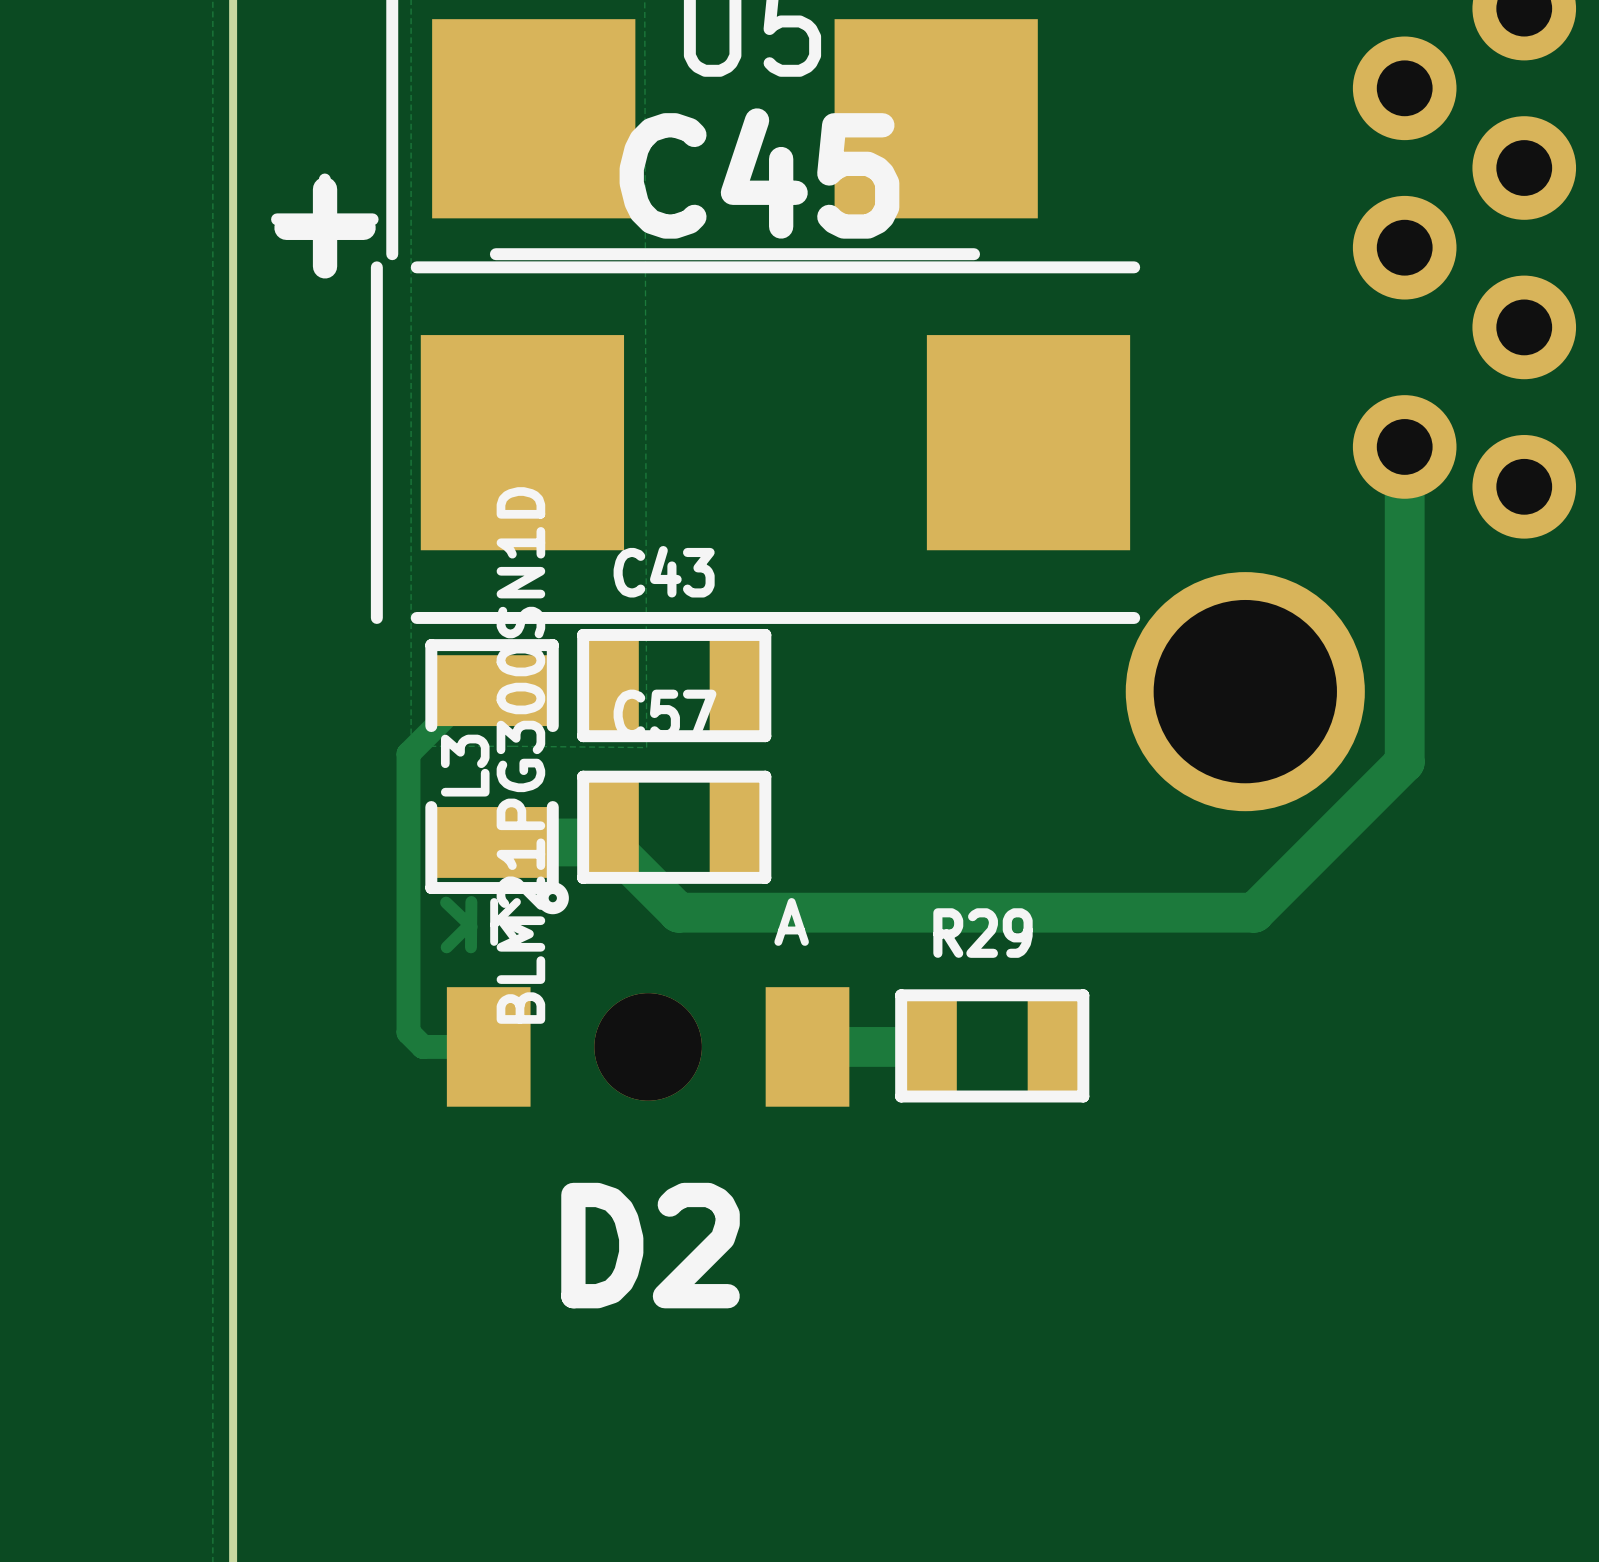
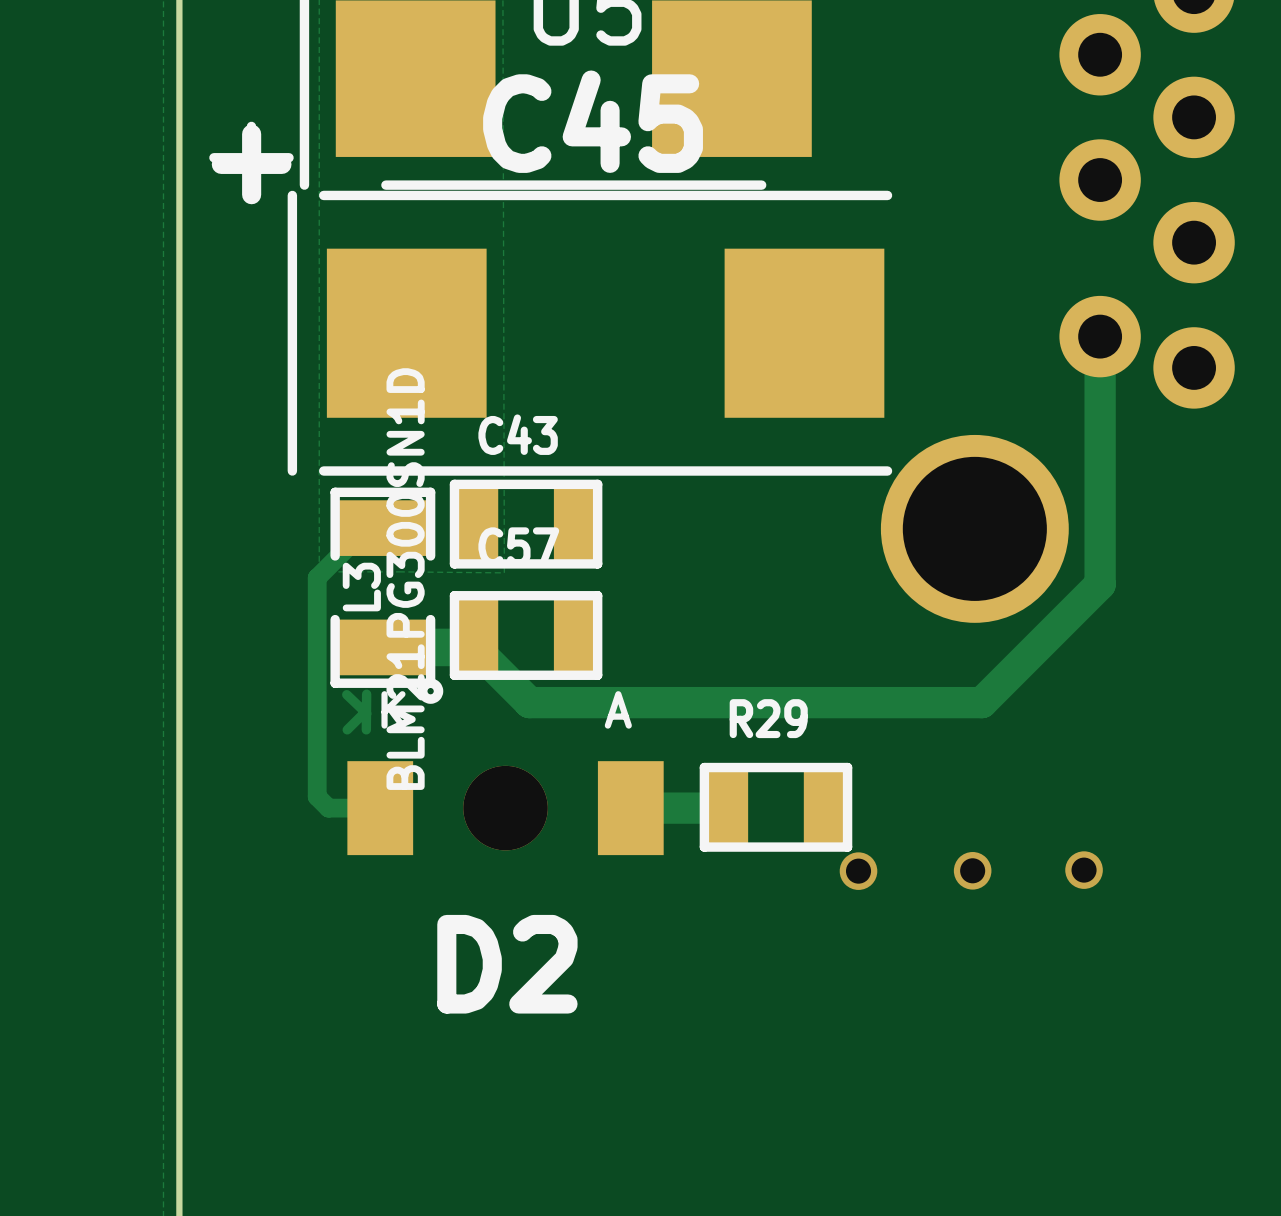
via: none -> (1084, 870)
via: none -> (972, 870)
via: none -> (858, 871)

